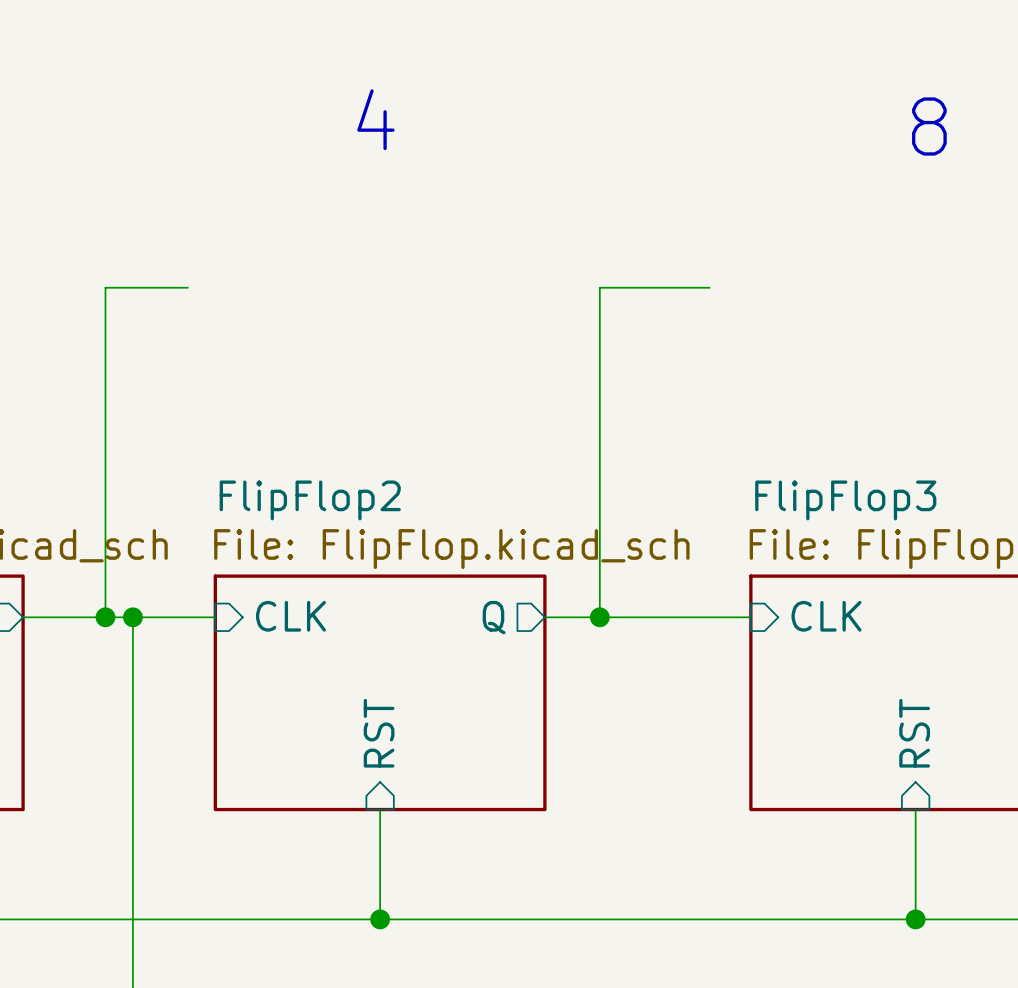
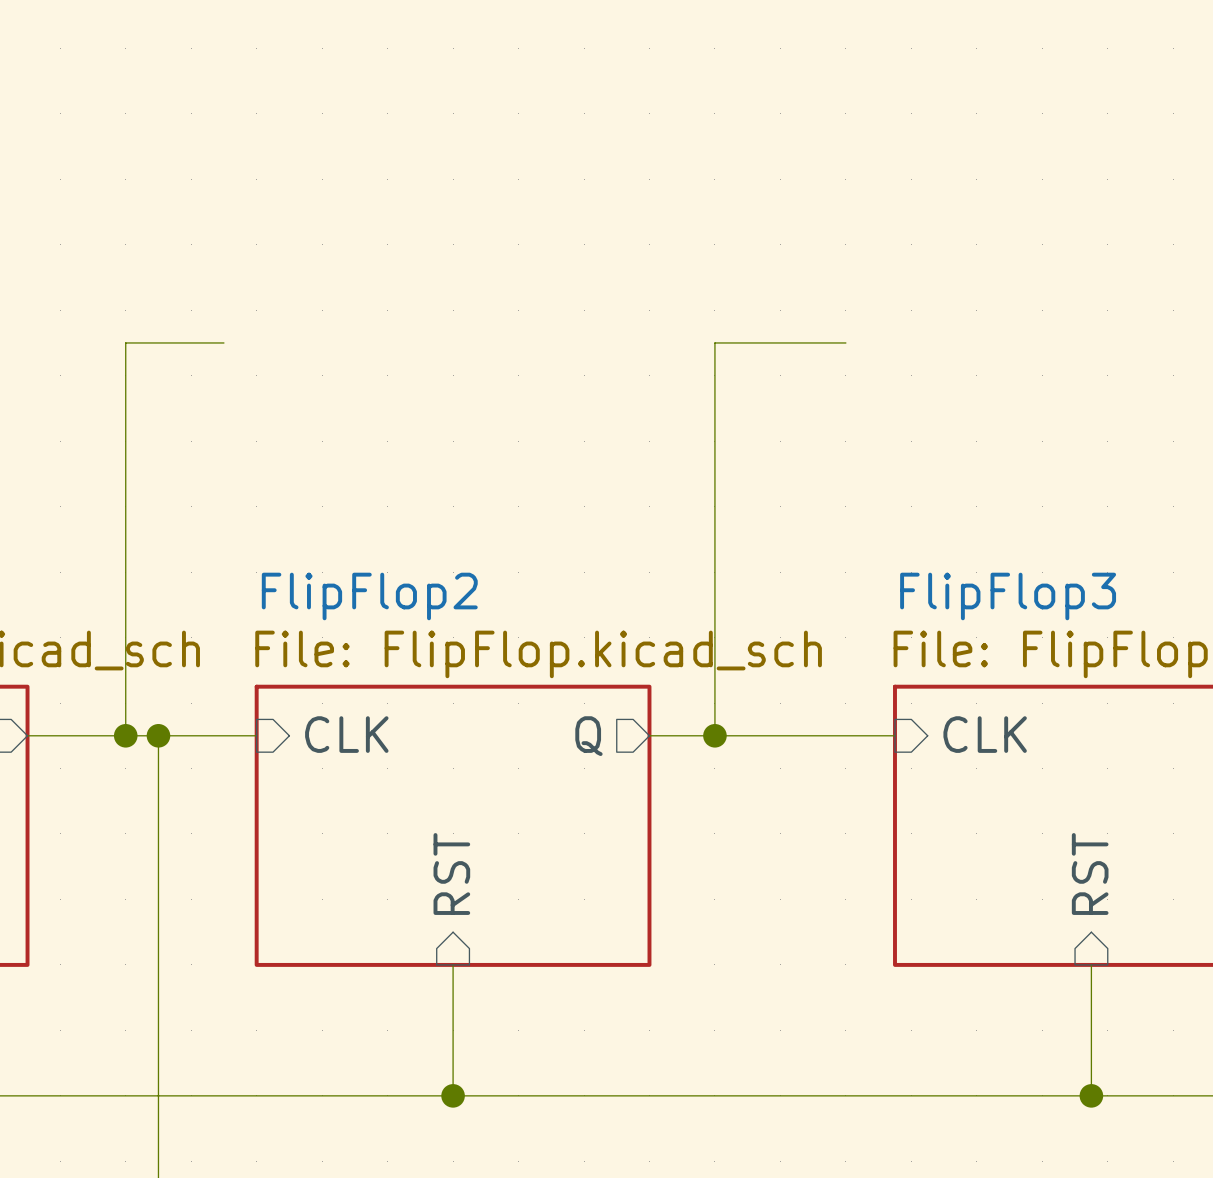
text: 4 (375, 119) -> none
text: 8 (929, 126) -> none

